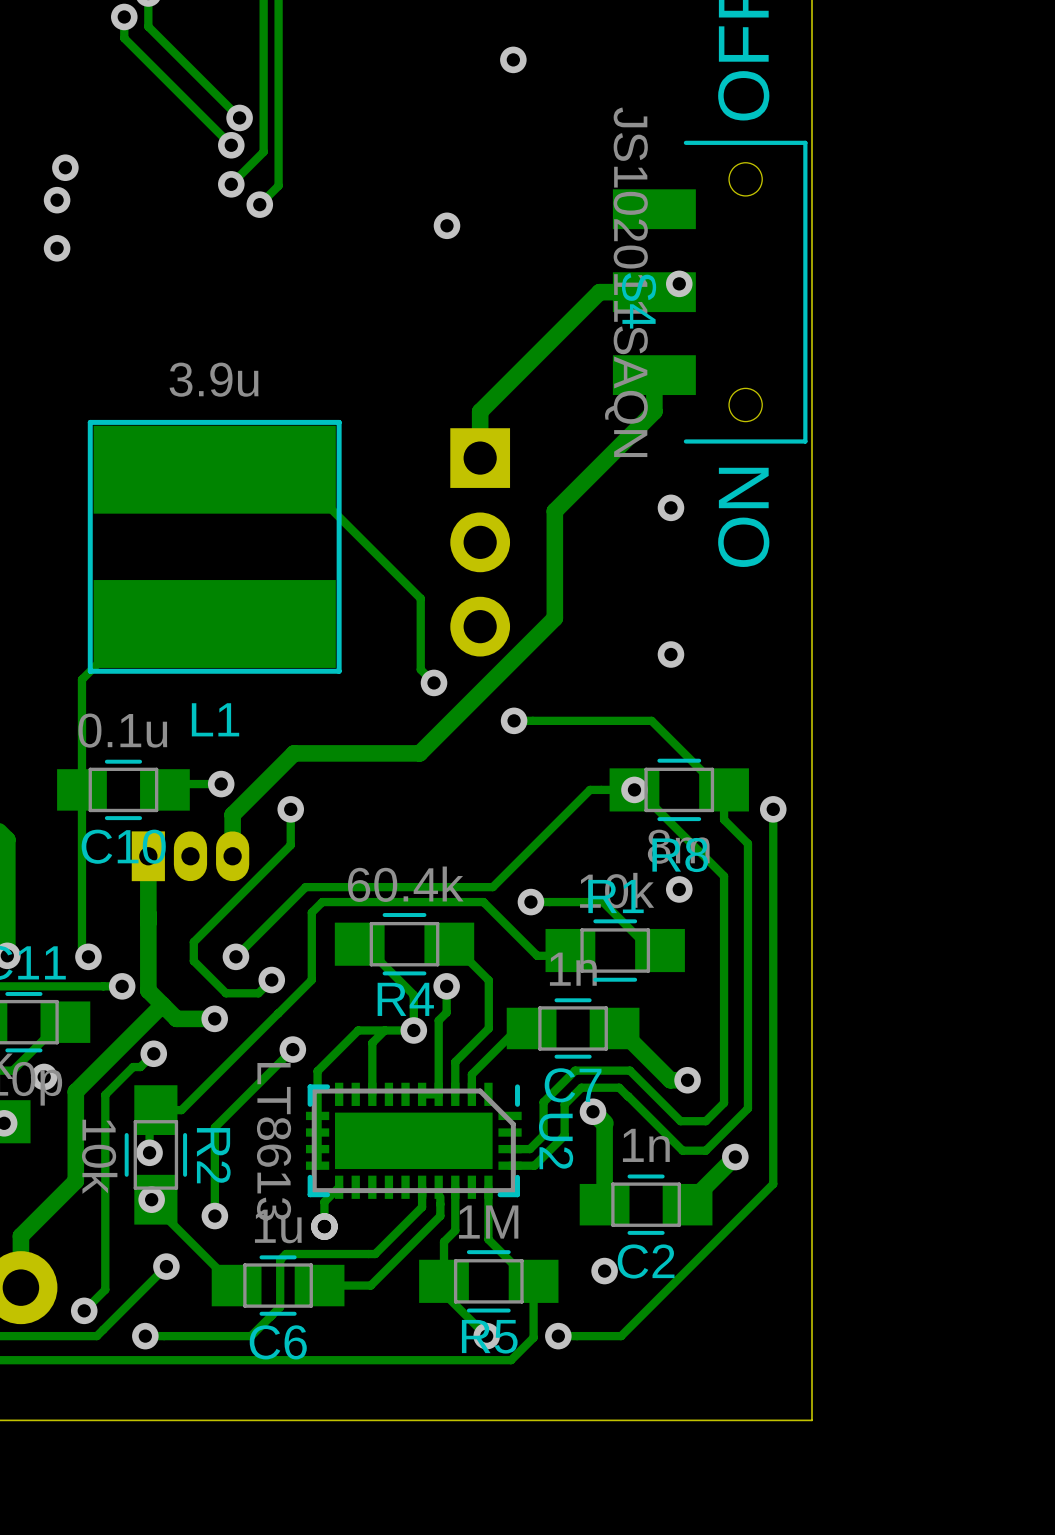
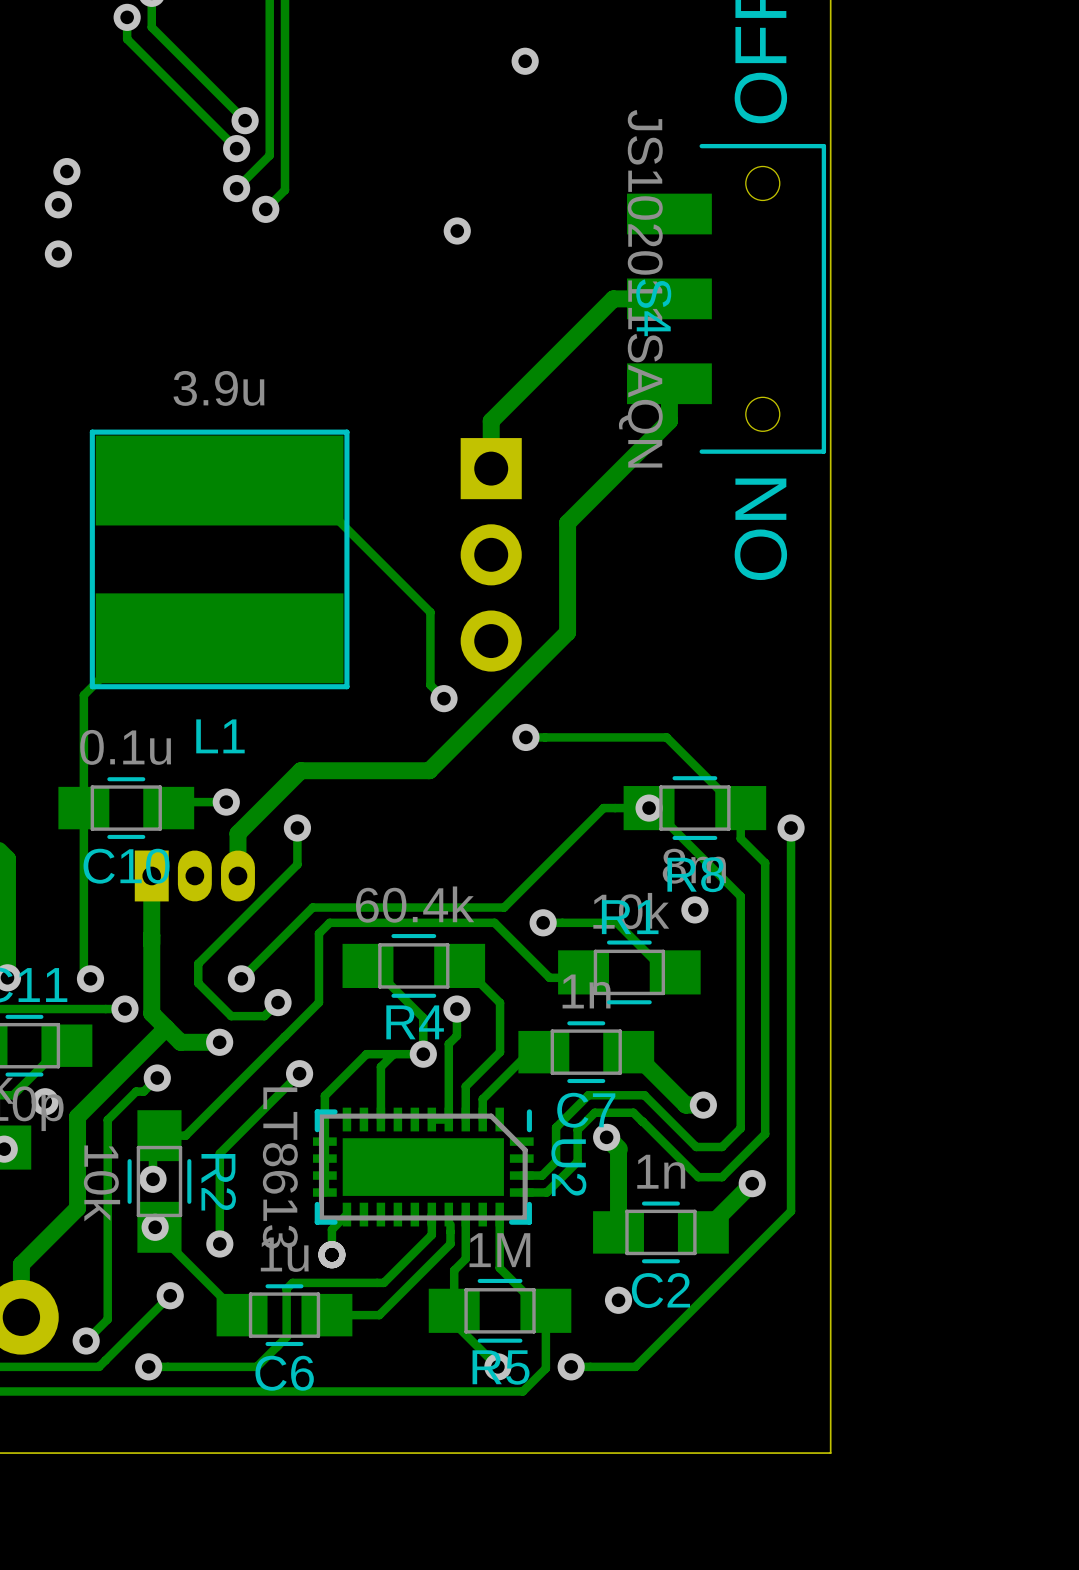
via: (679, 283) -> none
via: (670, 507) -> none
via: (670, 654) -> none

